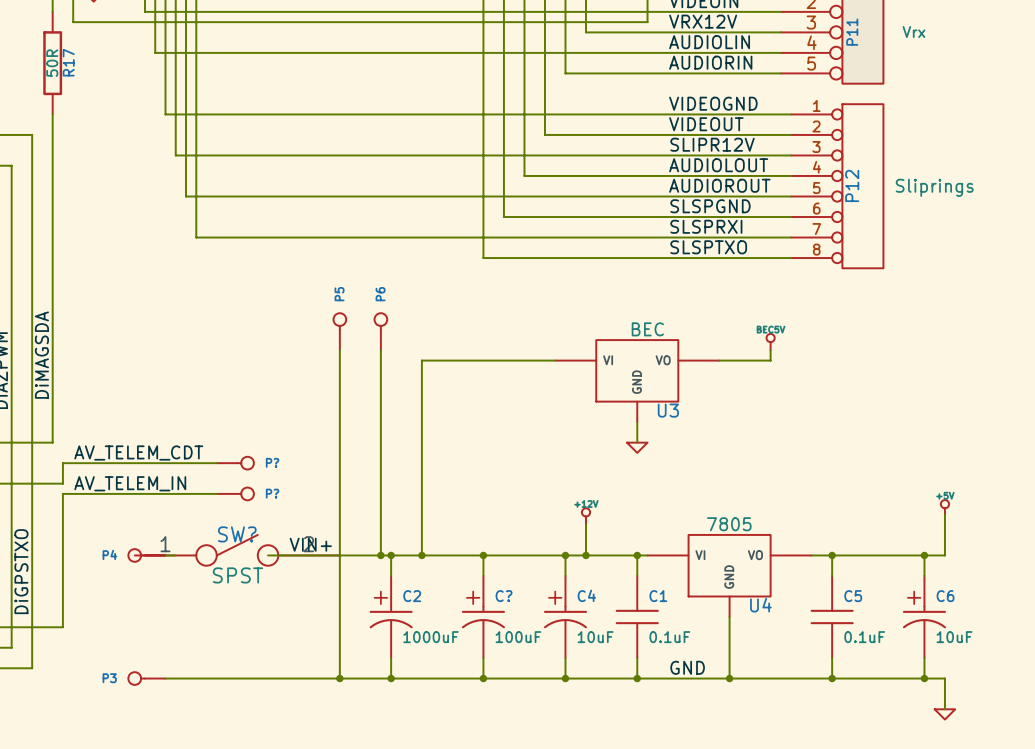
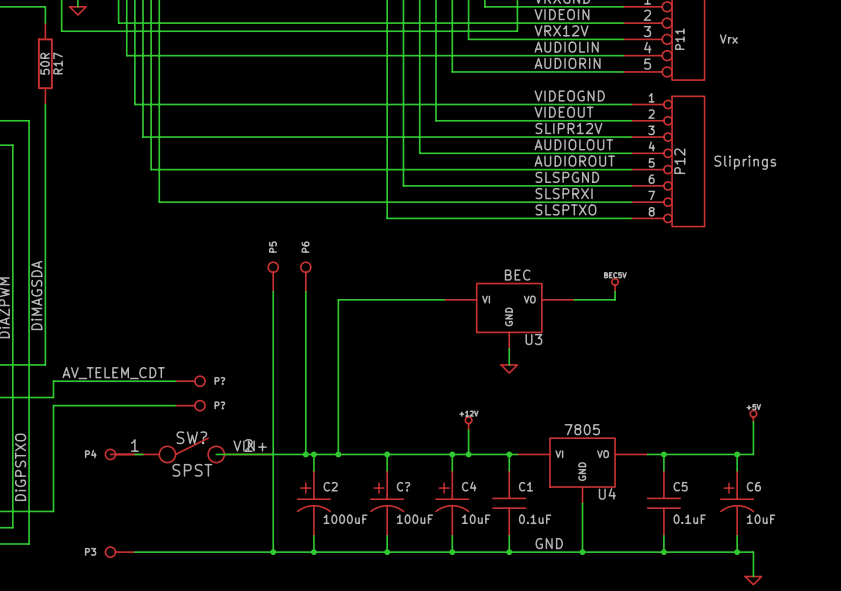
label: AV_TELEM_IN (130, 483) -> none

